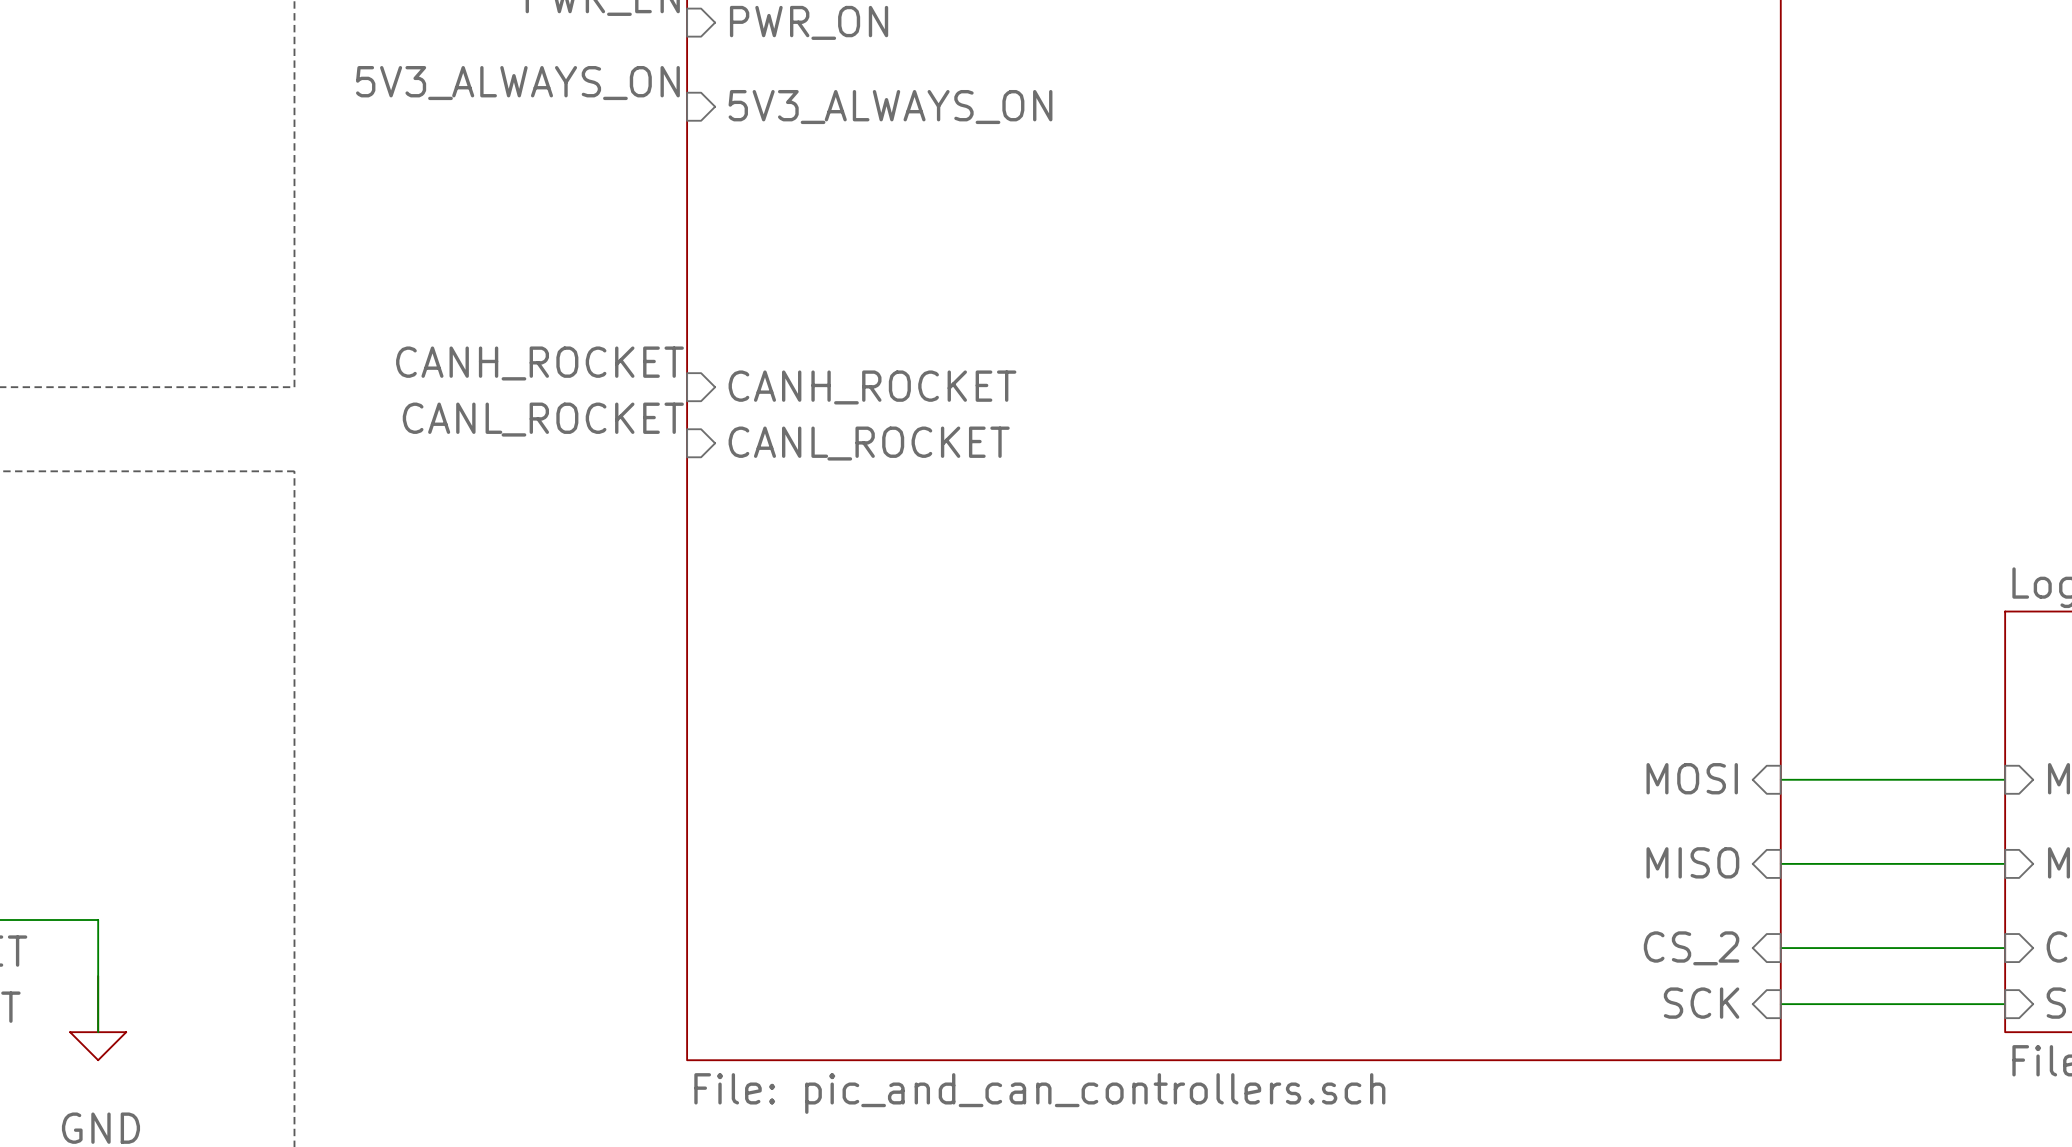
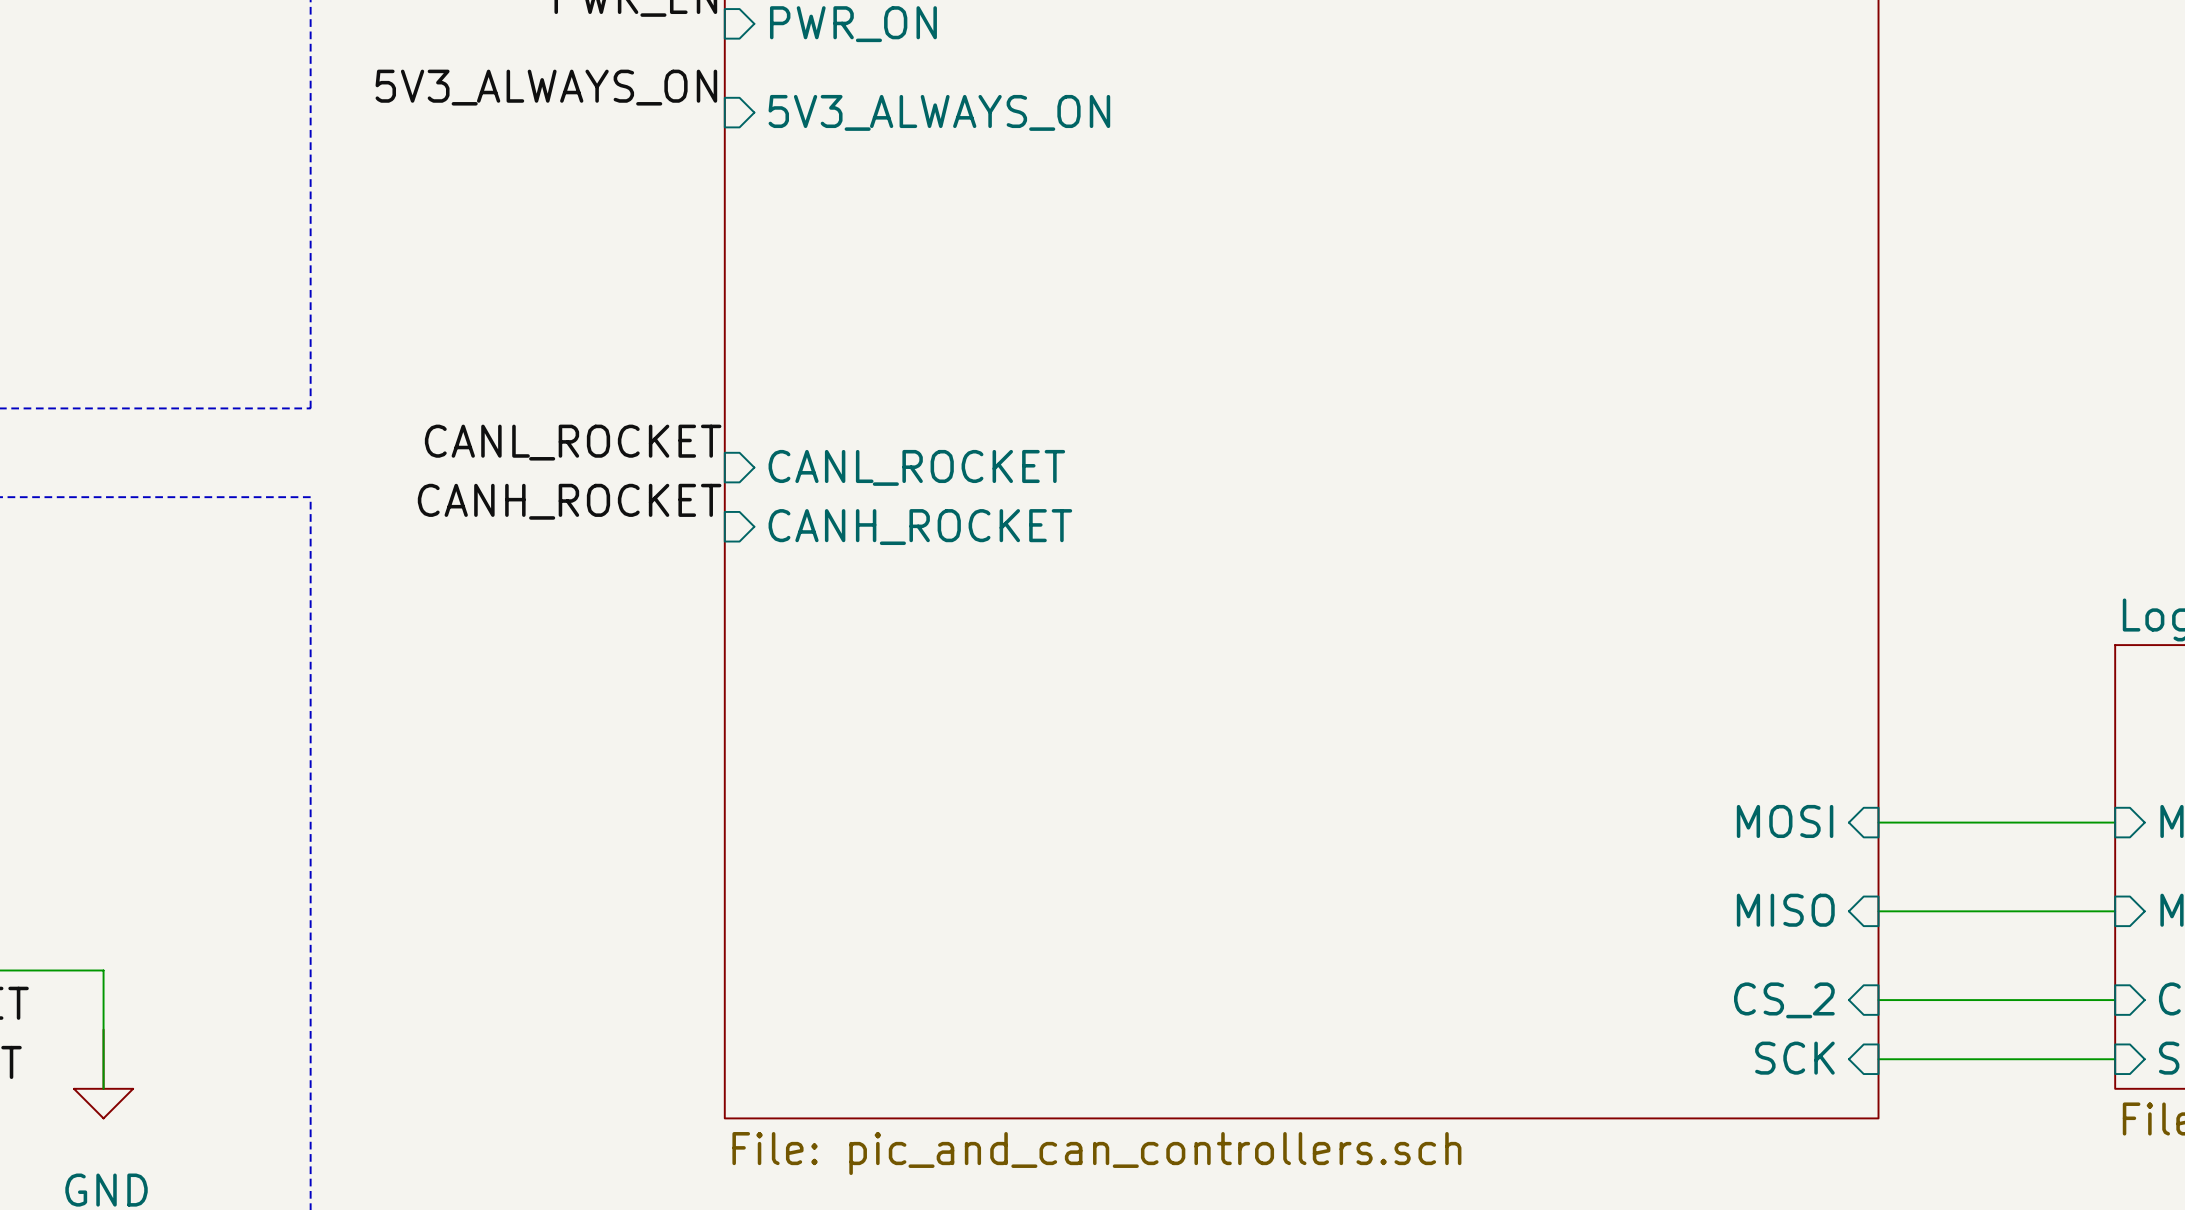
label position: CANH_ROCKET (539, 363) -> CANH_ROCKET (569, 501)
sheet pin position: CANH_ROCKET (872, 387) -> CANH_ROCKET (920, 527)

